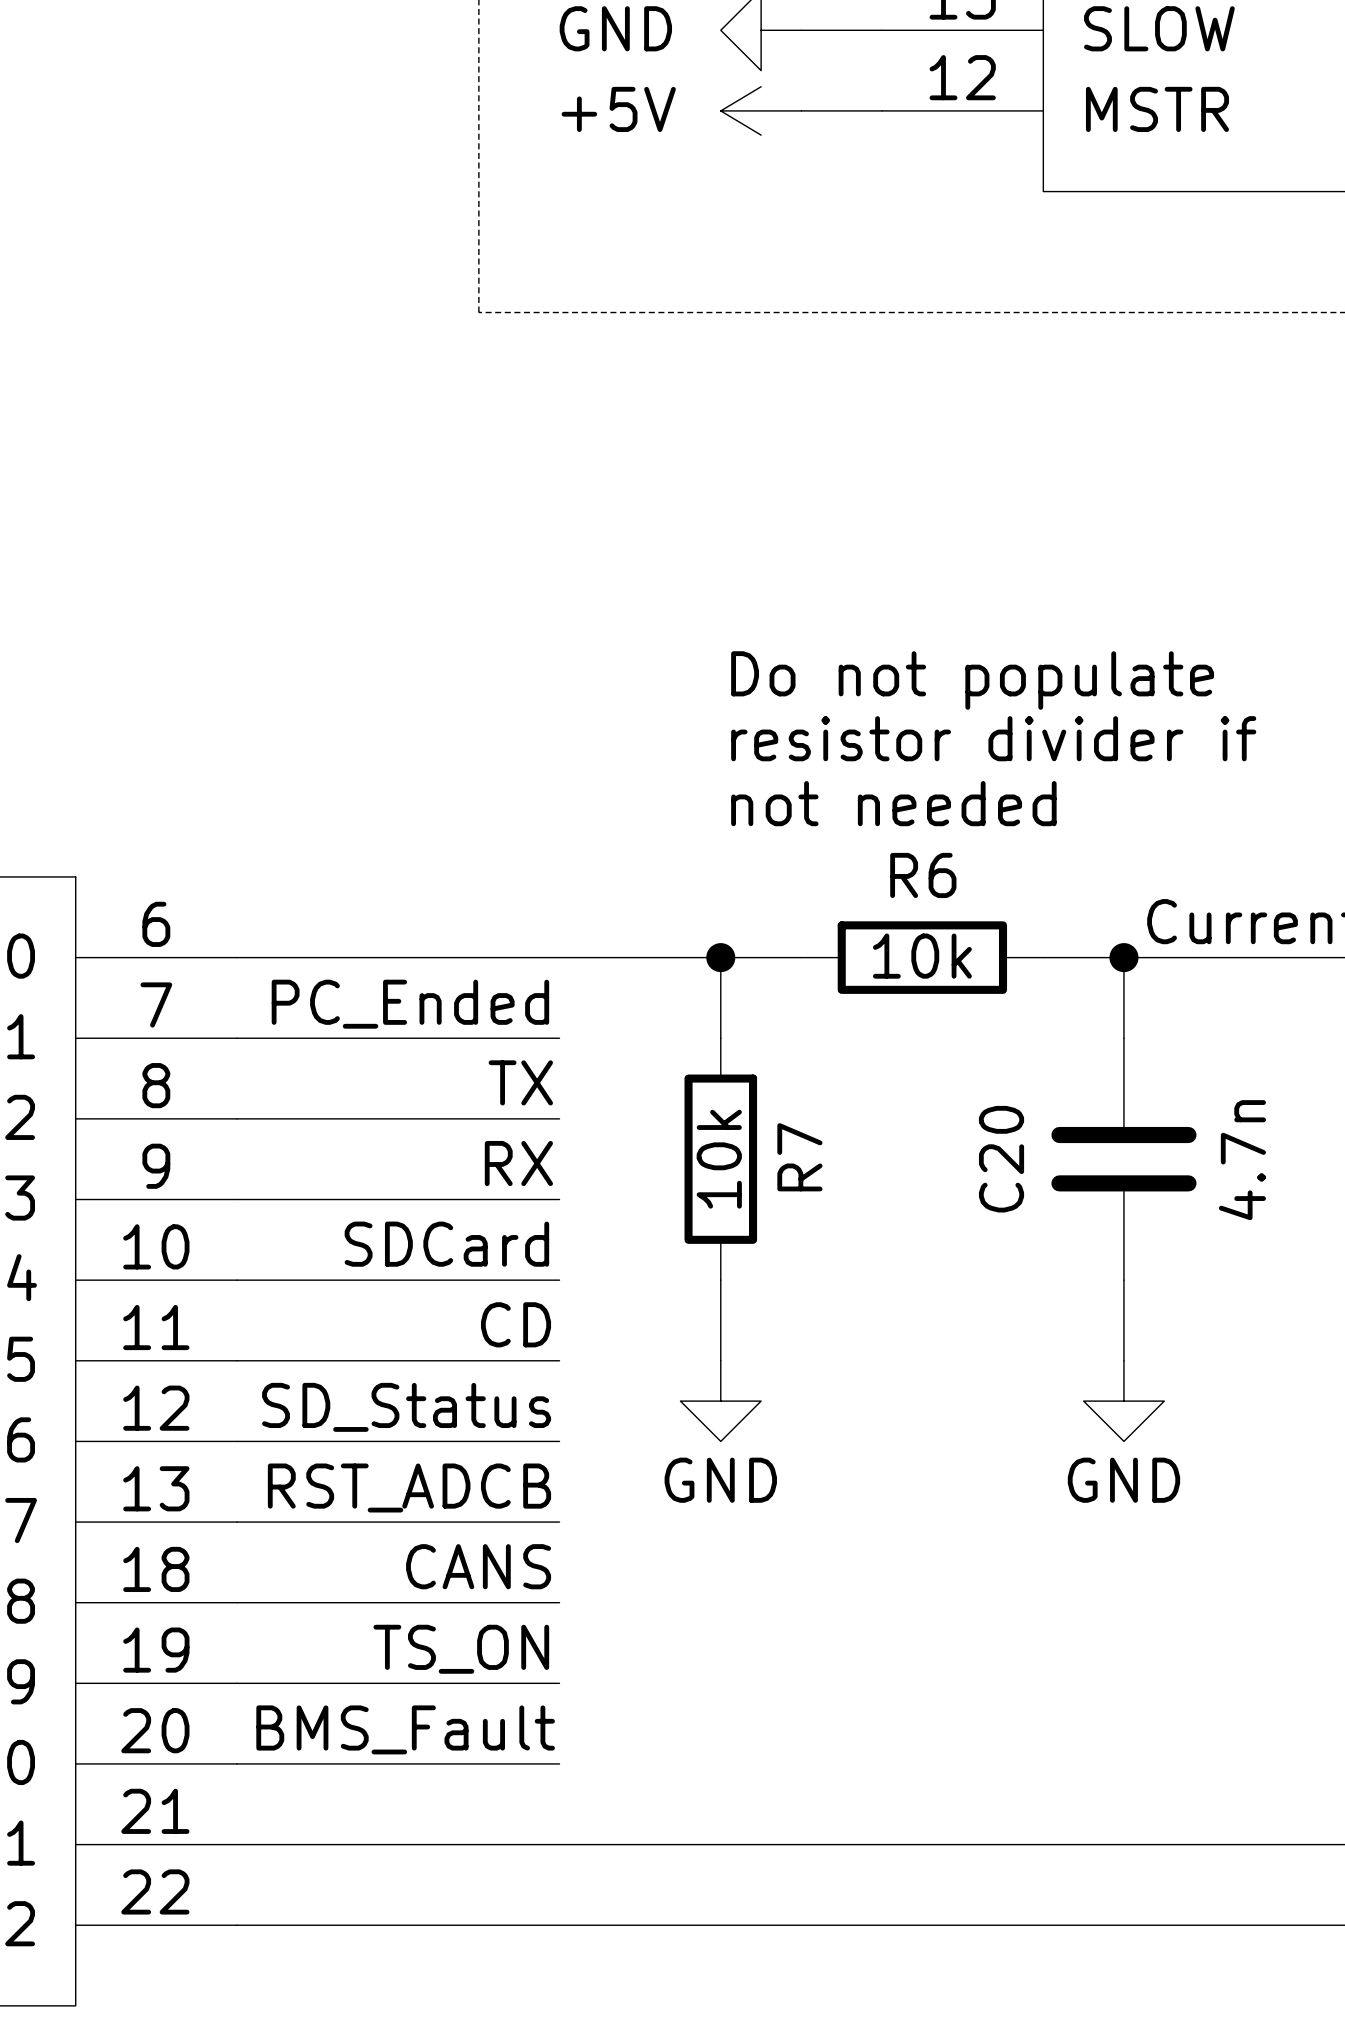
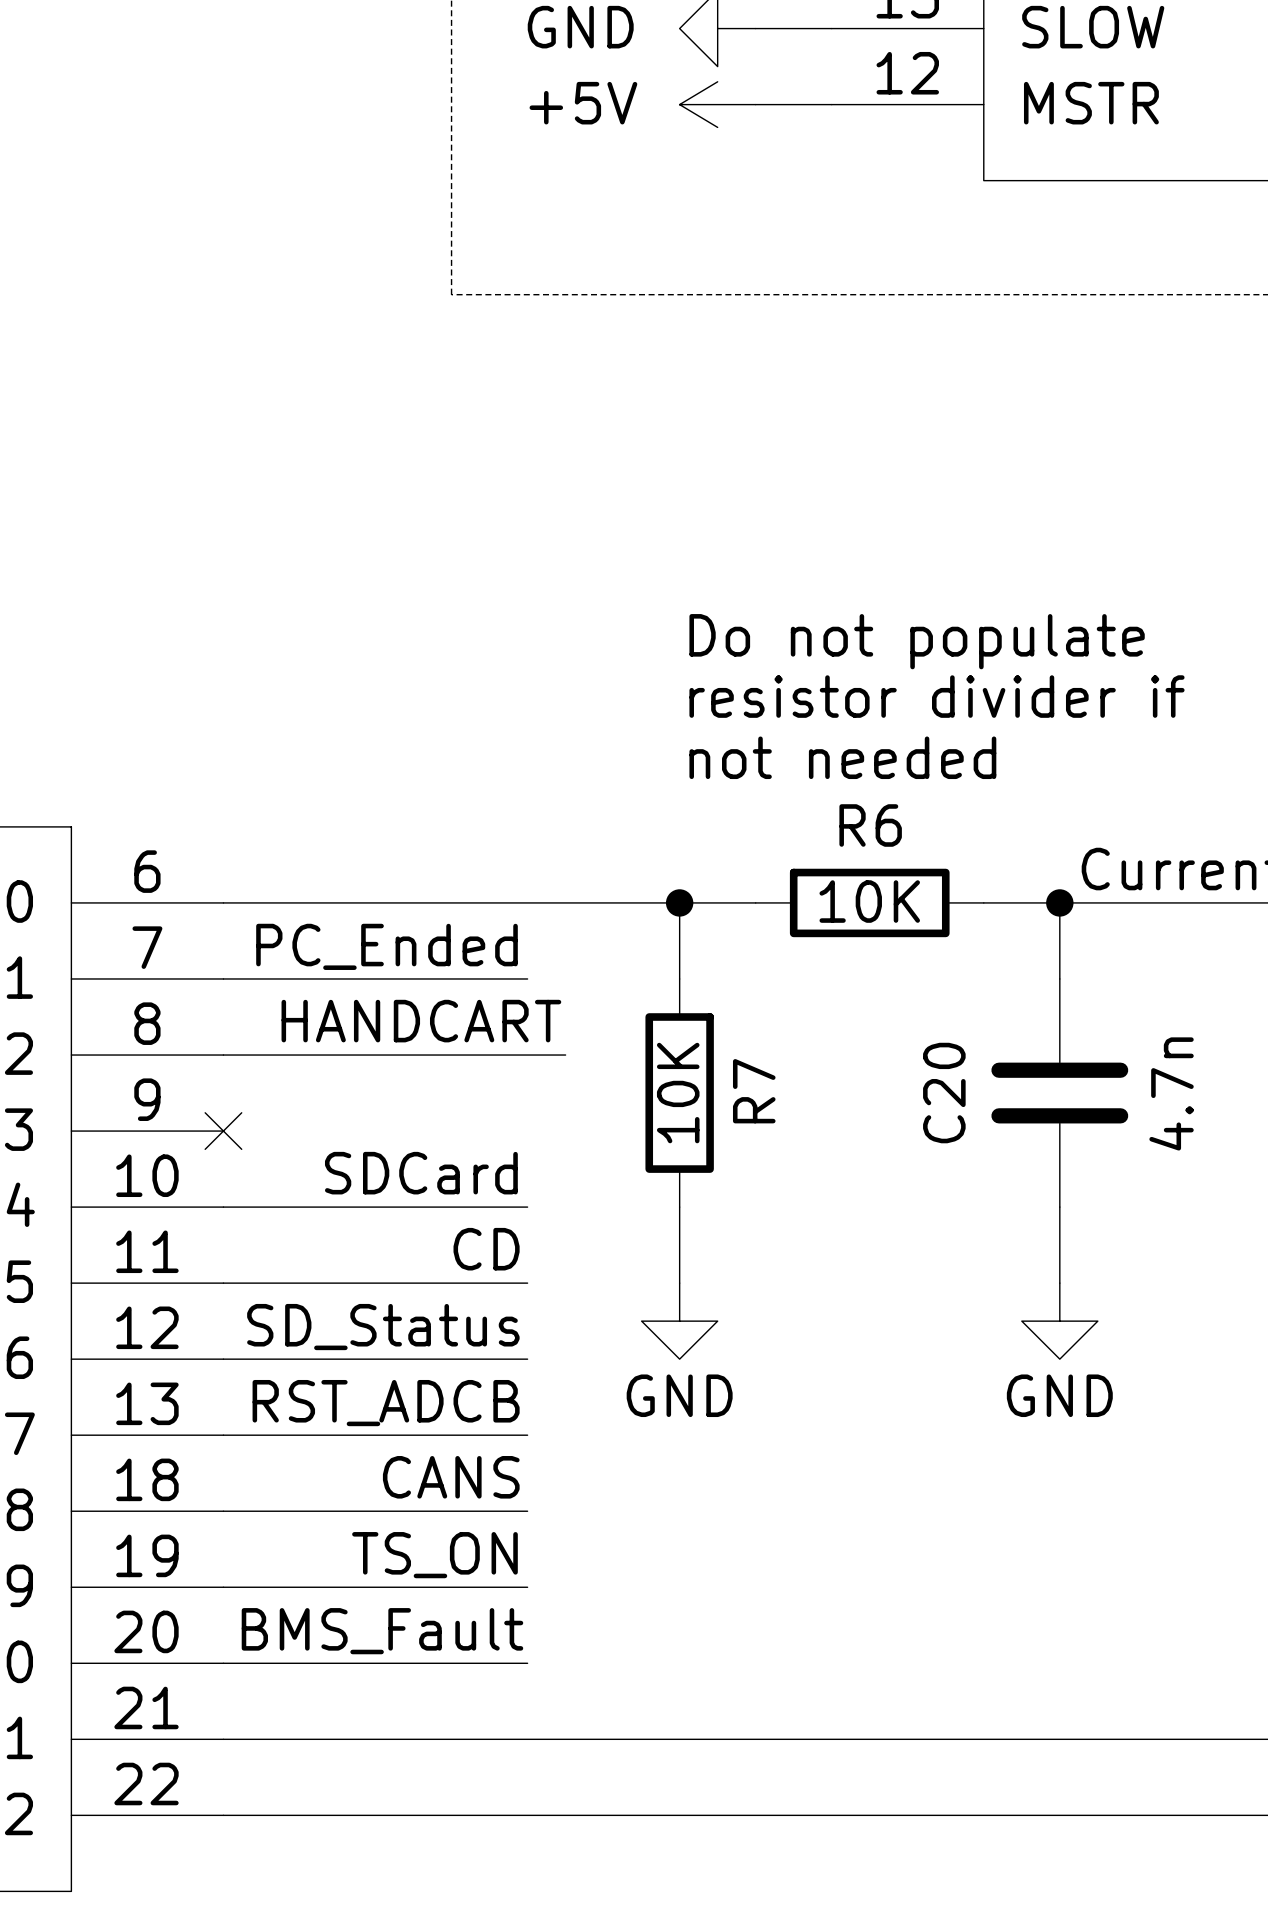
R6 value: 10k (922, 956) -> 10K (869, 901)
label: none -> HANDCART (421, 1021)
label: TX (520, 1082) -> none
wire: none -> (527, 1055) (565, 1055)
R7 value: 10k (719, 1159) -> 10K (678, 1093)
label: RX (518, 1163) -> none
wire: (236, 1199) (559, 1199) -> none
no-connect mark: none -> (223, 1131)

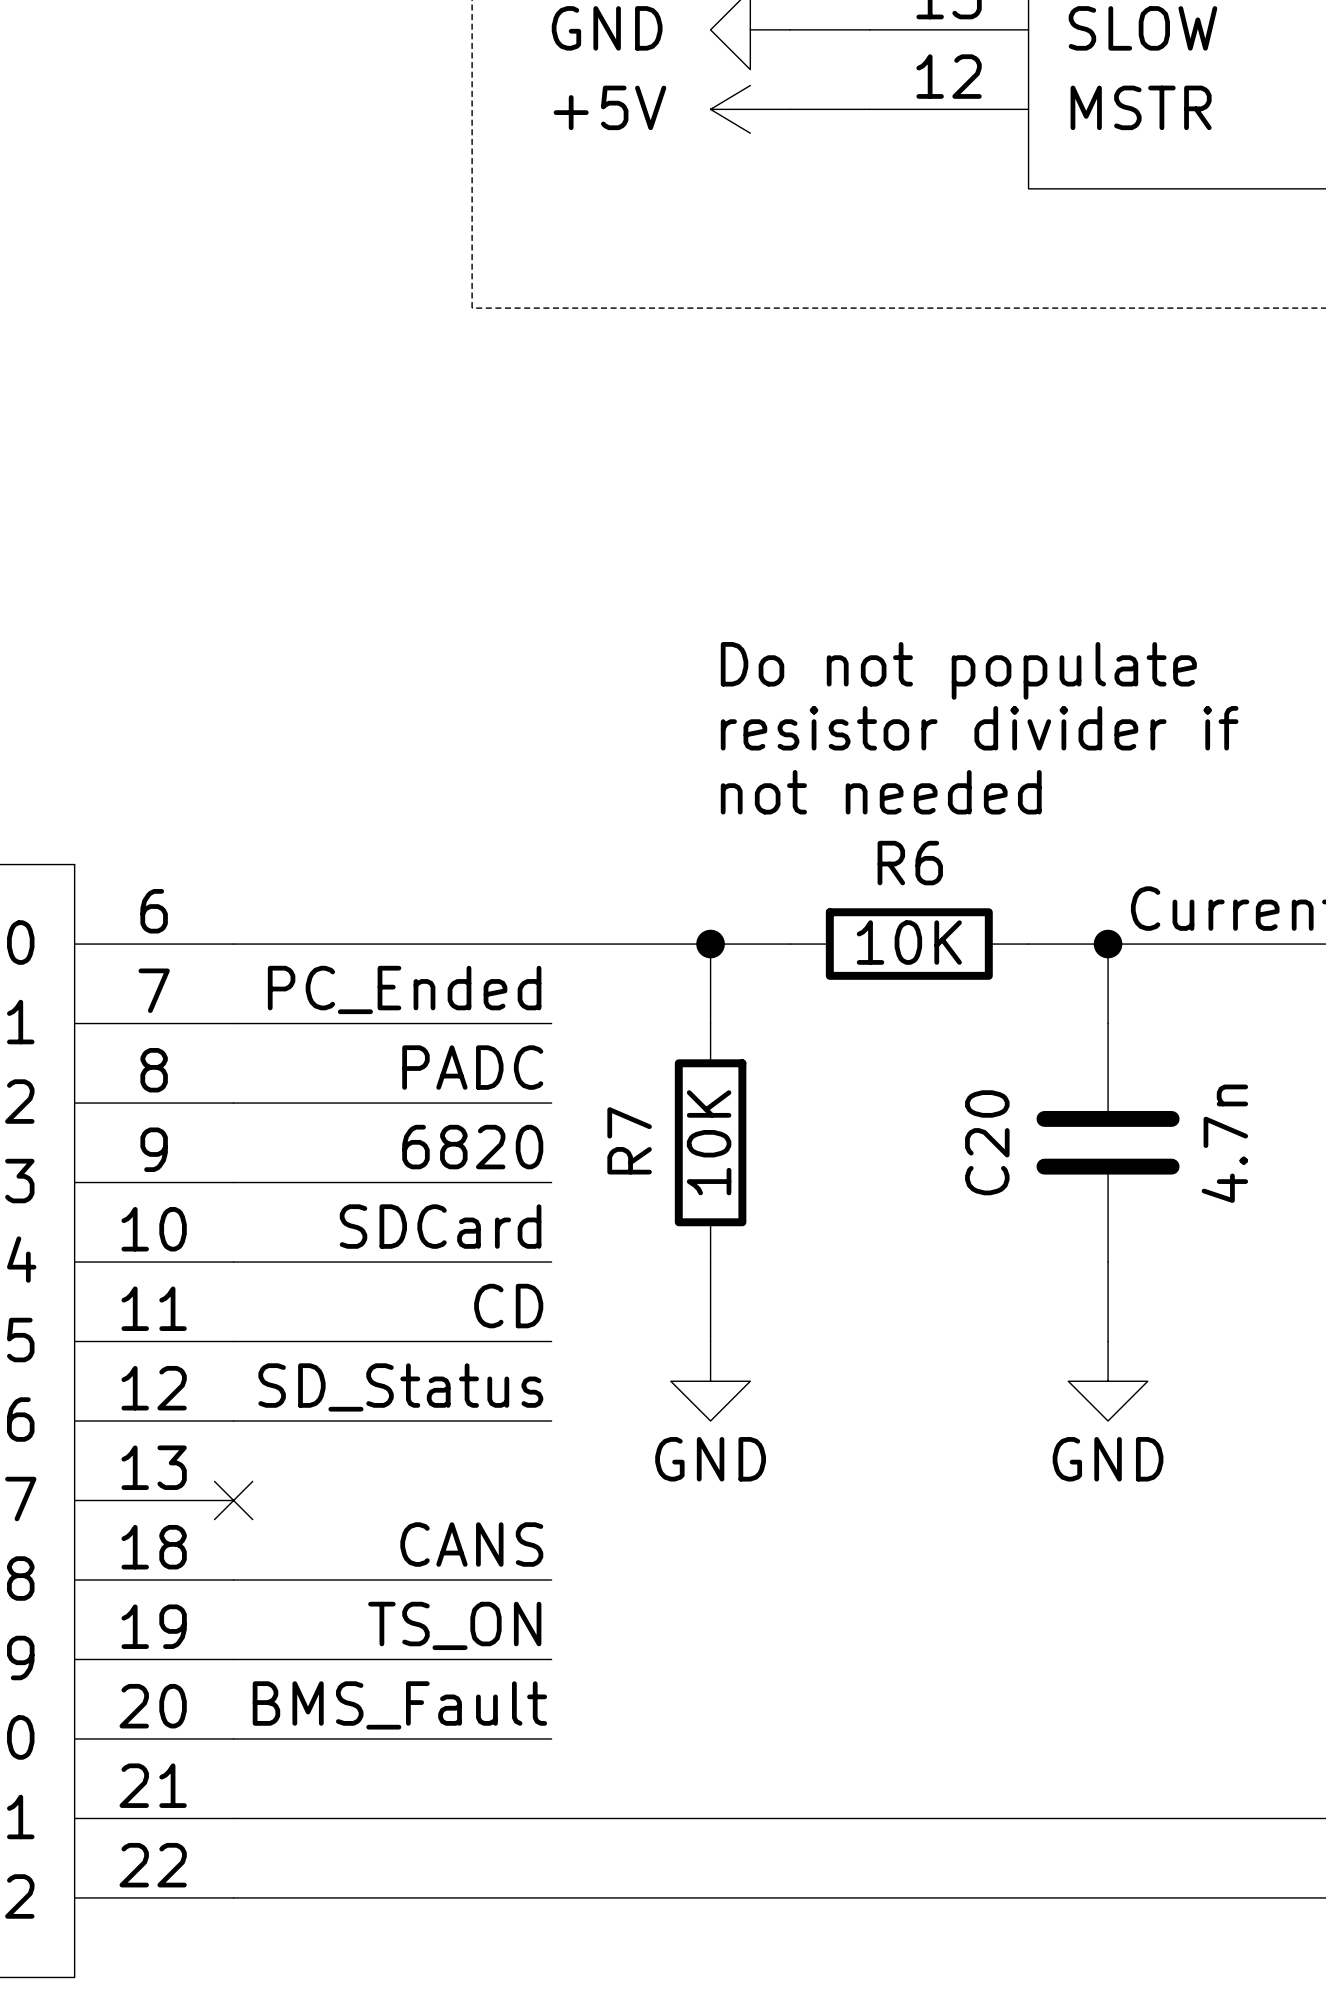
label: HANDCART (421, 1021) -> none
label: none -> PADC (472, 1067)
wire: (527, 1055) (565, 1055) -> none
R7 name position: R7 (754, 1091) -> R7 (629, 1140)
label: none -> 6820 (472, 1147)
no-connect mark: (223, 1131) -> none
label: RST_ADCB (386, 1403) -> none
wire: (223, 1435) (527, 1435) -> (233, 1182) (551, 1182)
no-connect mark: none -> (233, 1500)

